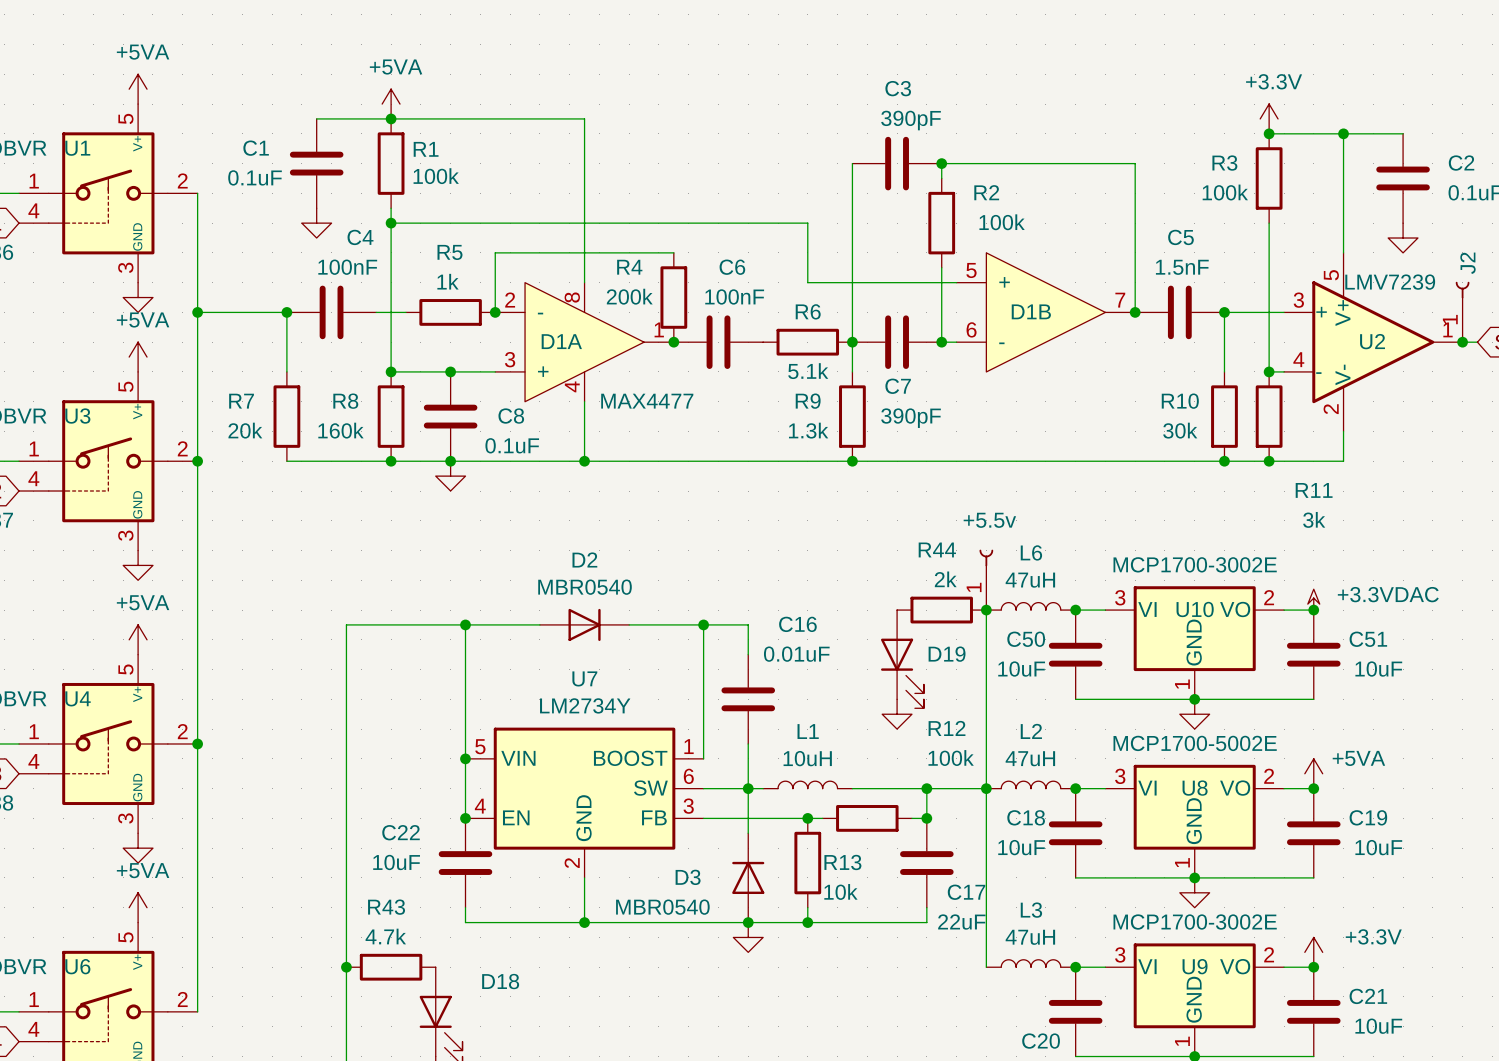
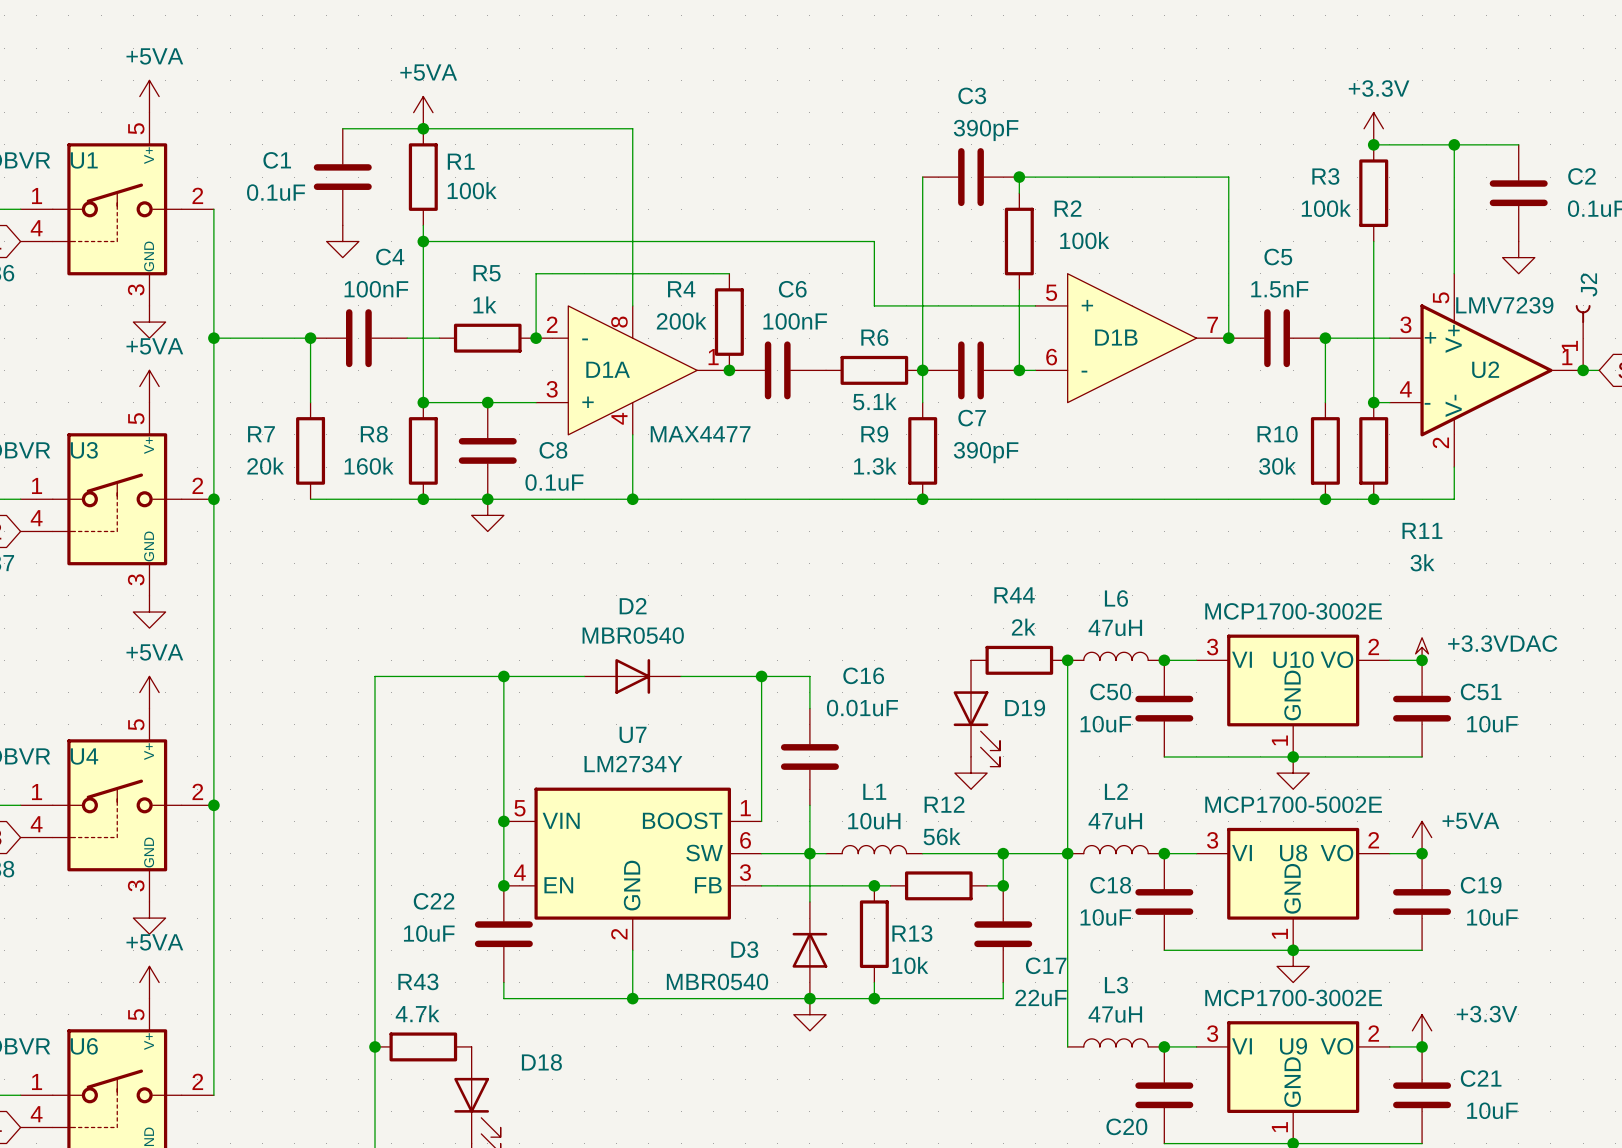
part: +5.5v (986, 579) -> none
R12 name position: R12 (947, 728) -> R12 (944, 804)
R12 value: 100k (951, 758) -> 56k (942, 836)

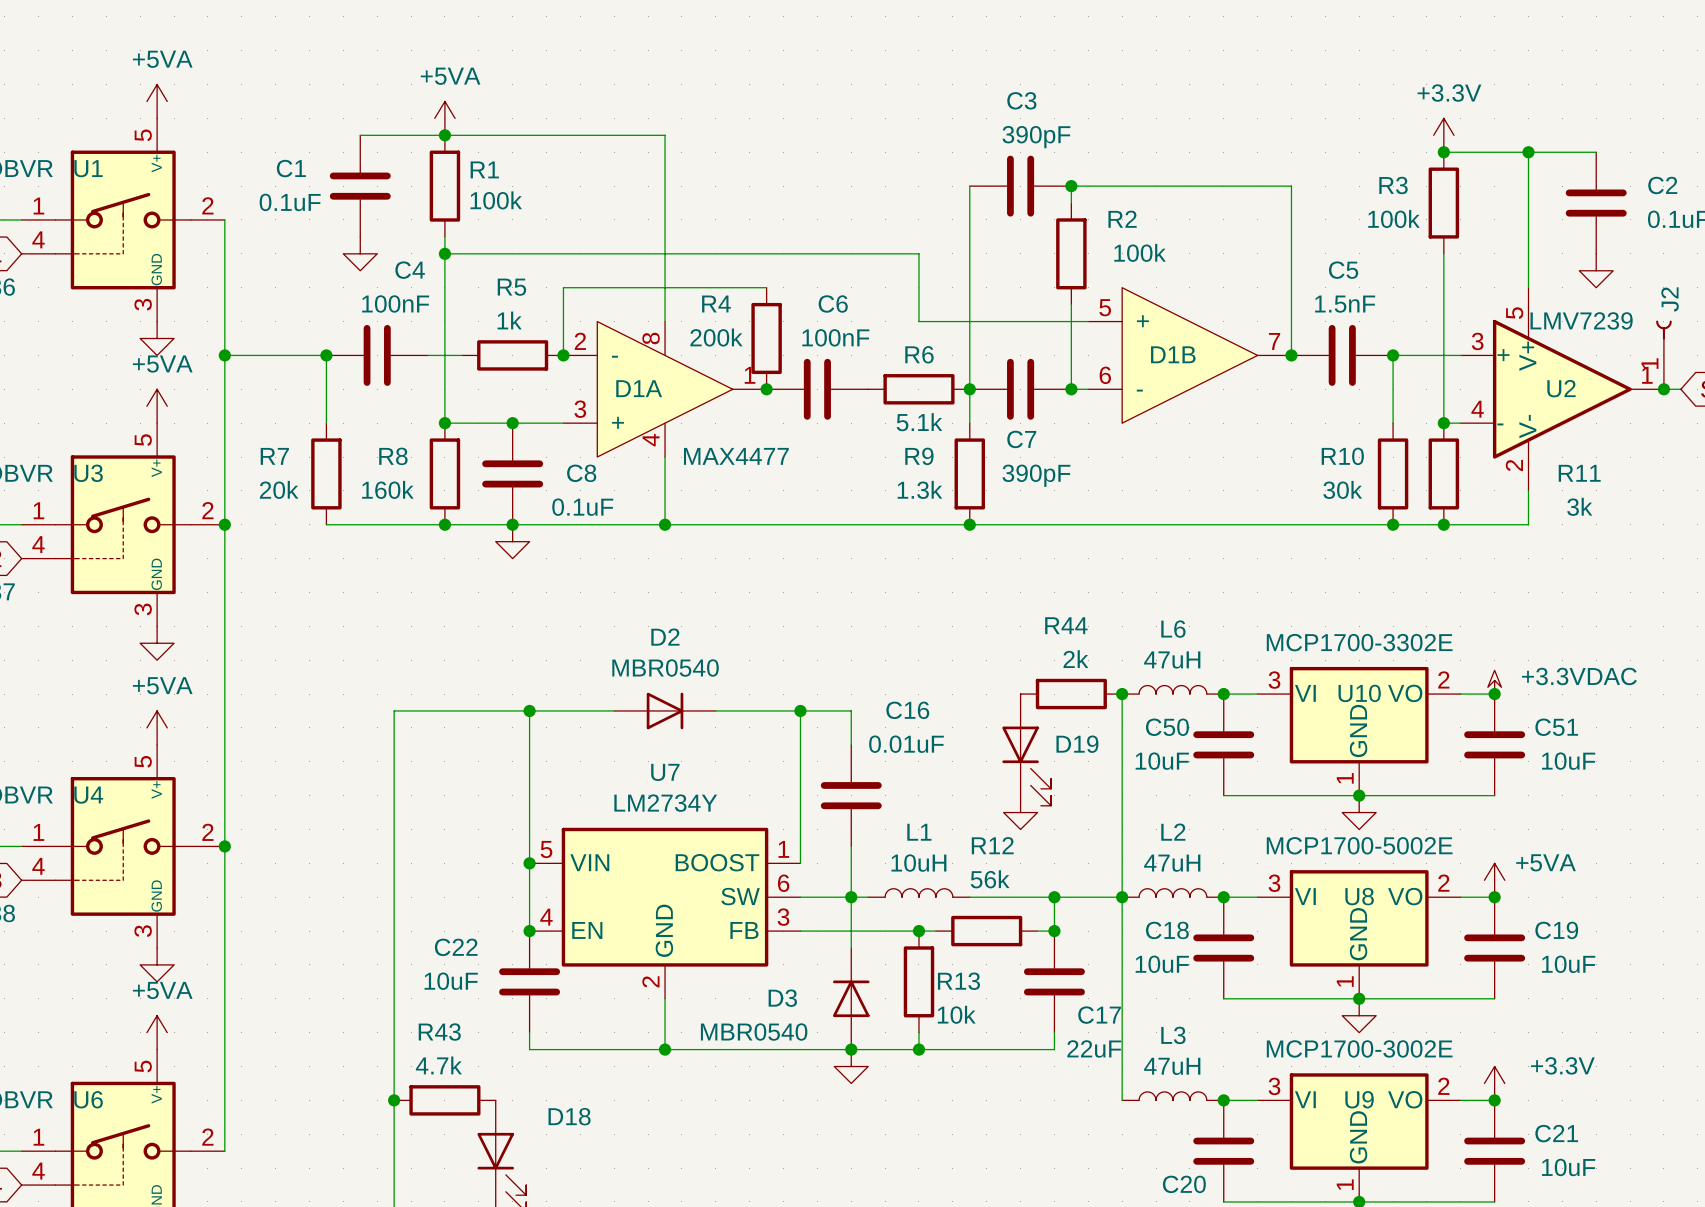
R11 name position: R11 (1422, 530) -> R11 (1579, 473)
R11 value position: 3k (1422, 562) -> 3k (1579, 506)
U10 value: MCP1700-3002E (1293, 611) -> MCP1700-3302E (1359, 642)

